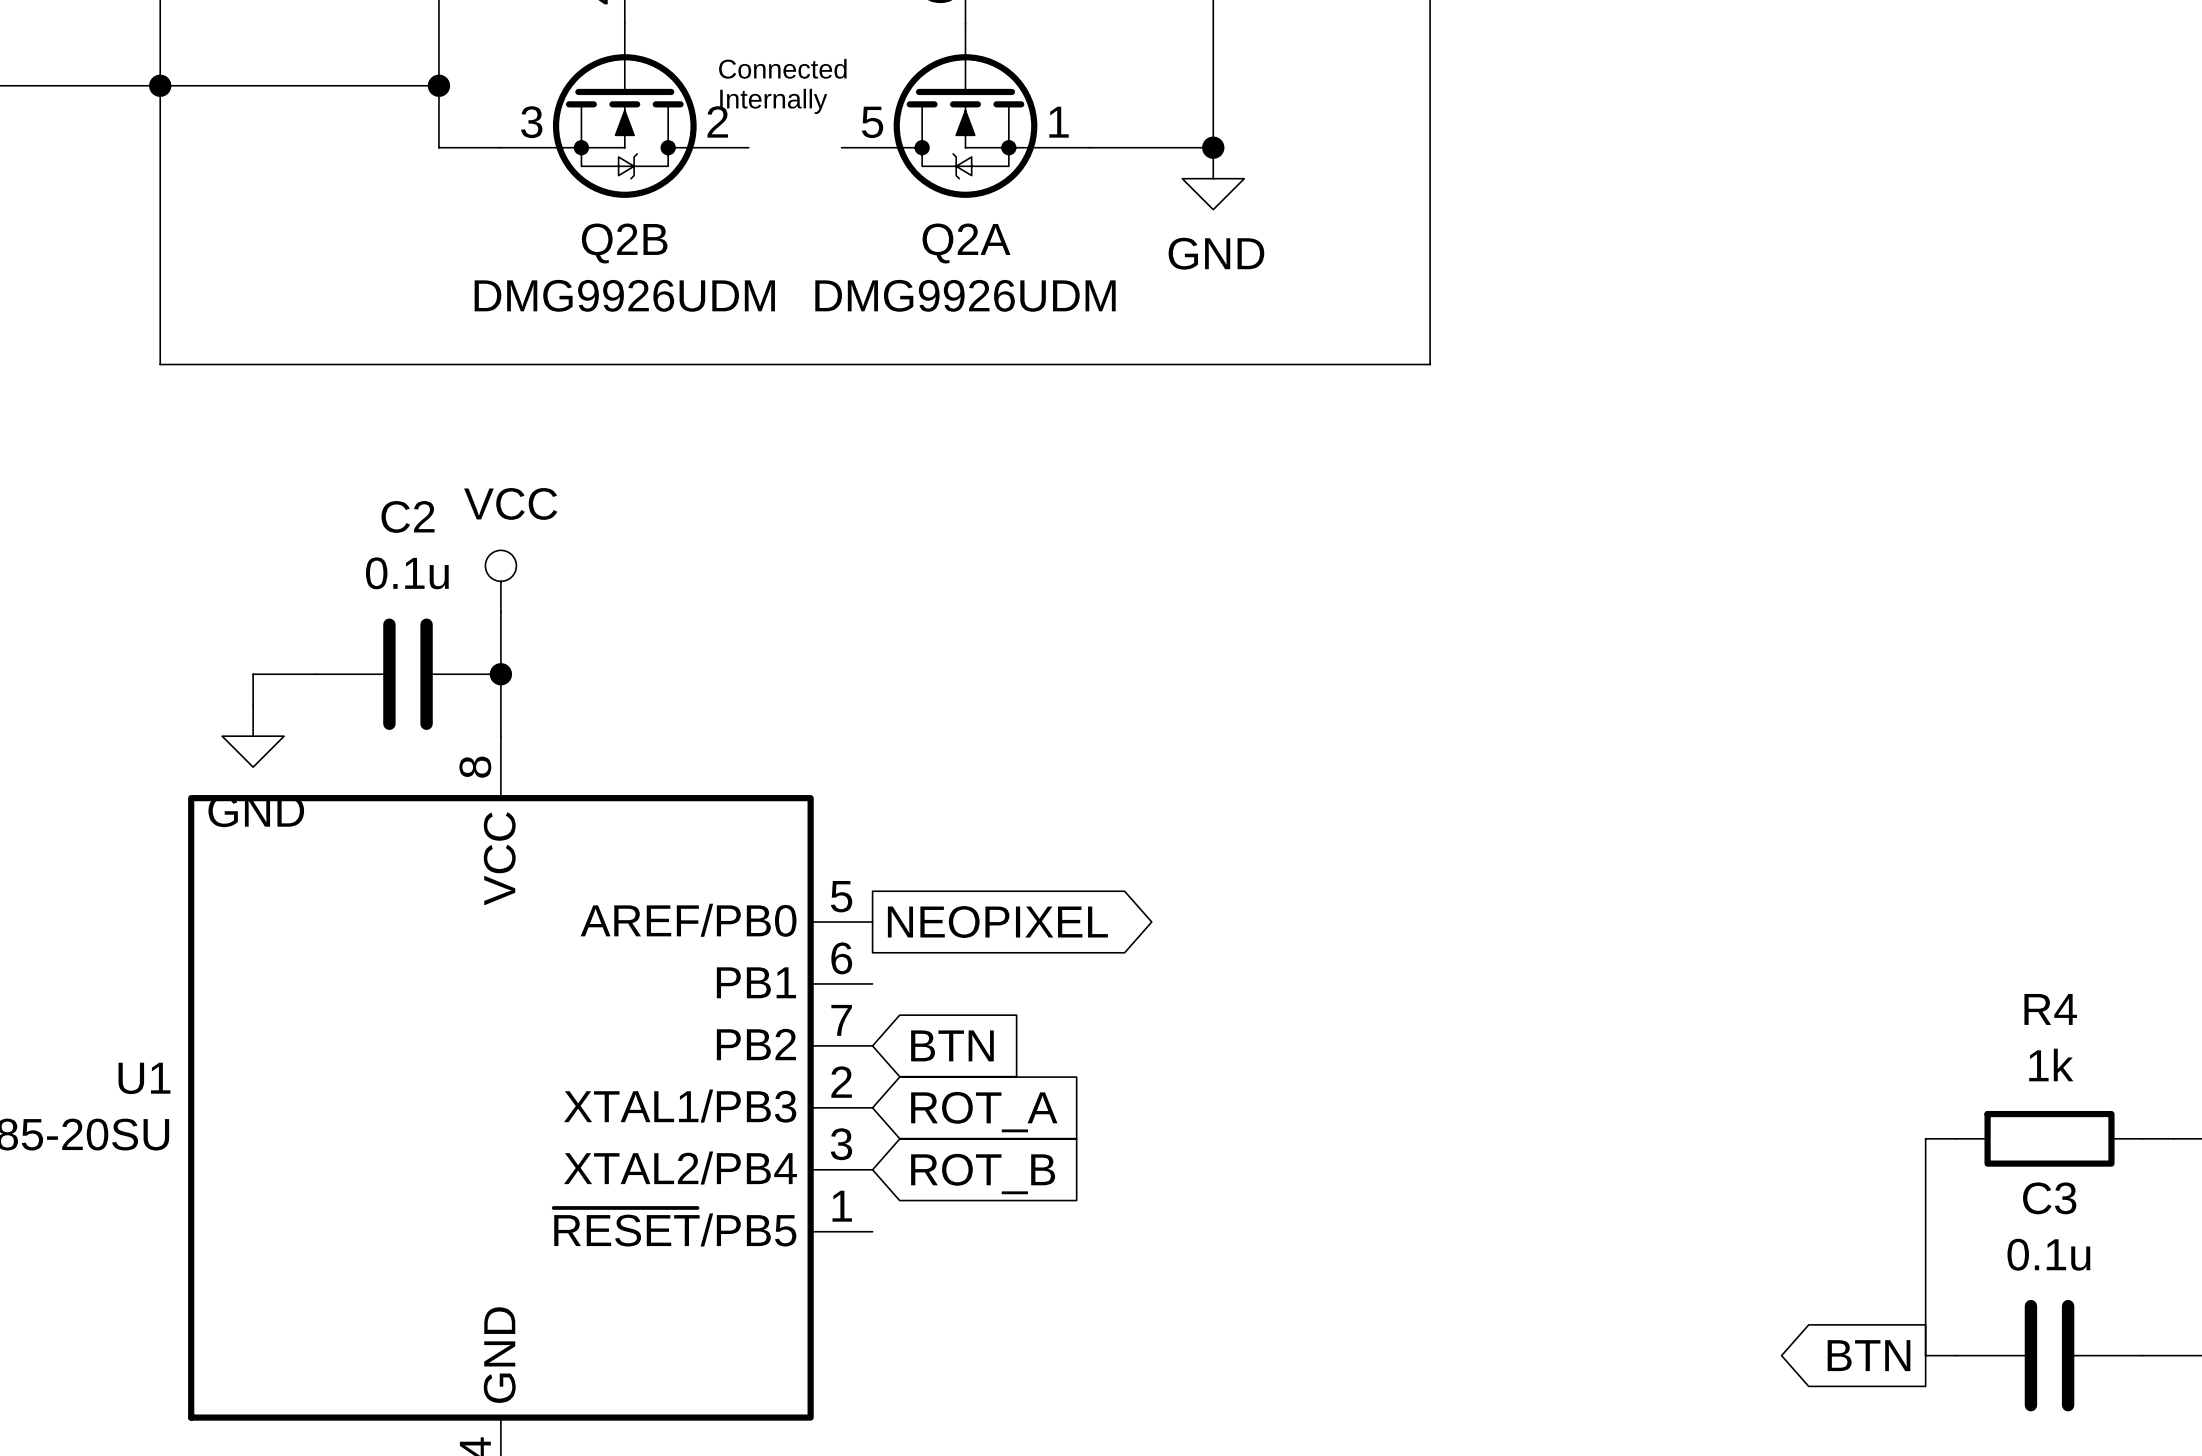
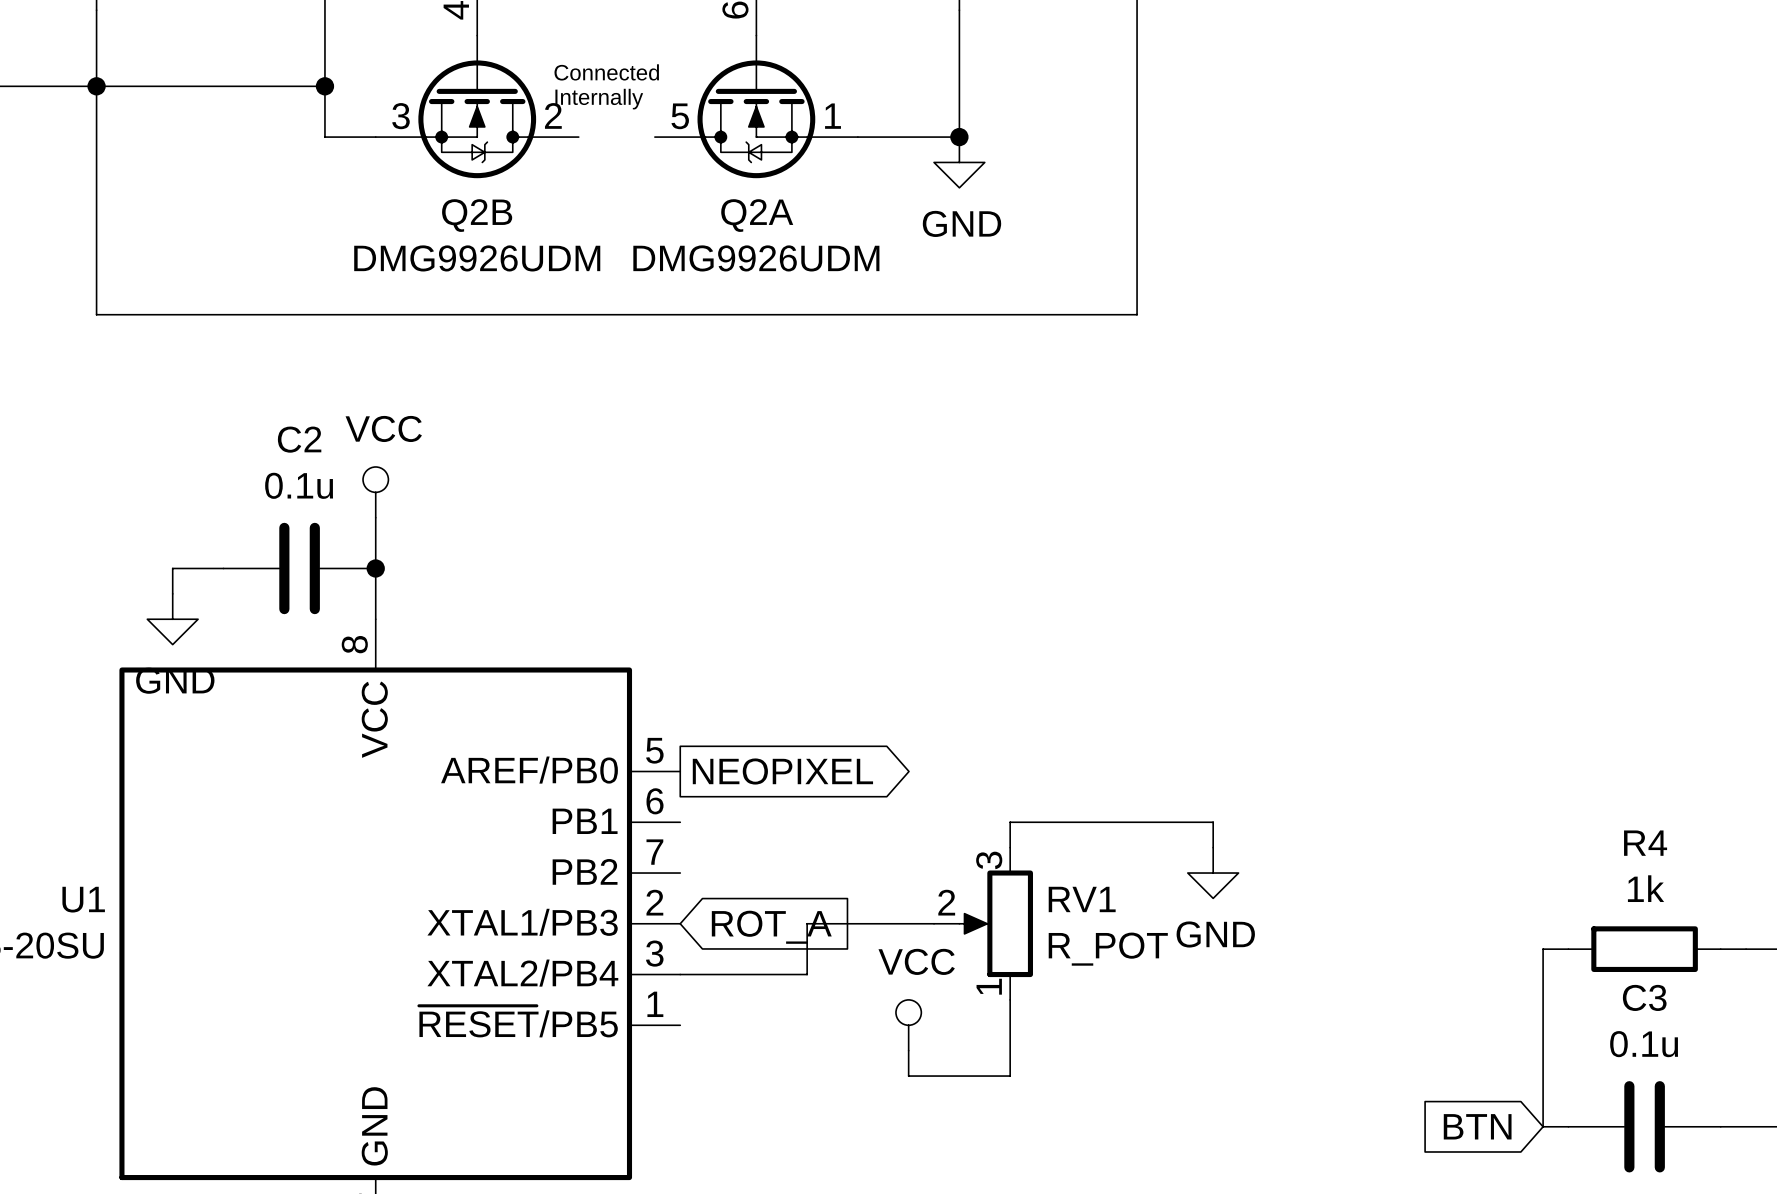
wire: none -> (1010, 847) (1010, 822) (1213, 822) (1213, 847)
global label: BTN (952, 1045) -> none
power symbol: none -> GND (1213, 873)
wire: none -> (934, 923) (807, 923) (807, 974) (680, 974)
RV1: none -> R_POT (983, 923)
global label: ROT_B (983, 1174) -> none
wire: none -> (1010, 999) (1010, 1076) (908, 1076) (908, 1050)
power symbol: none -> VCC (908, 1025)
global label shape: output (1869, 1355) -> input (1477, 1126)

